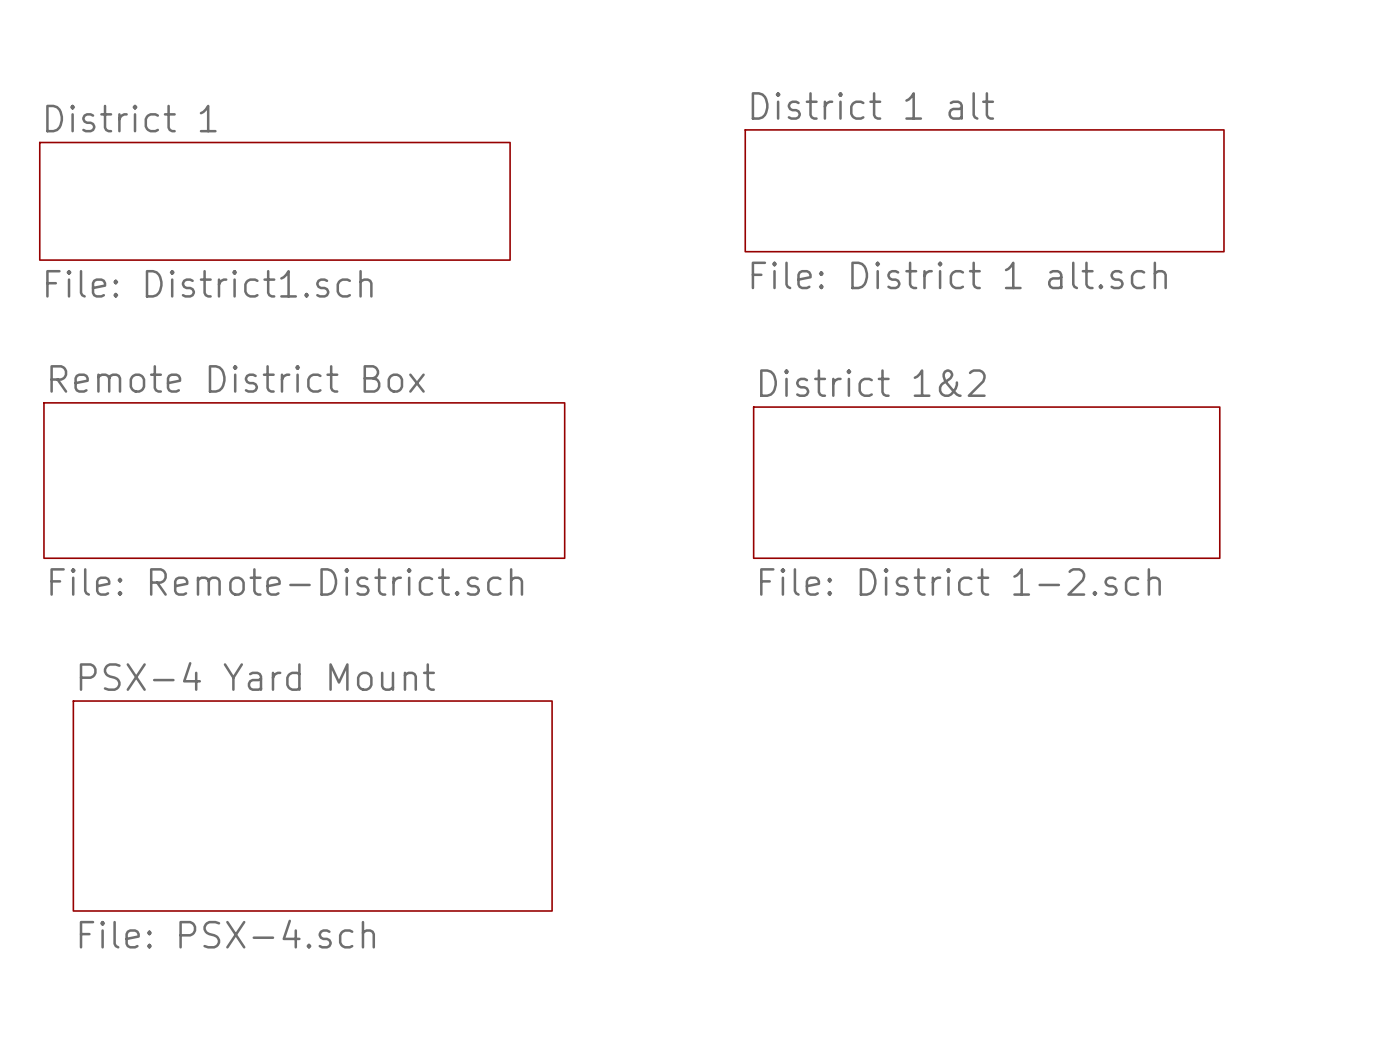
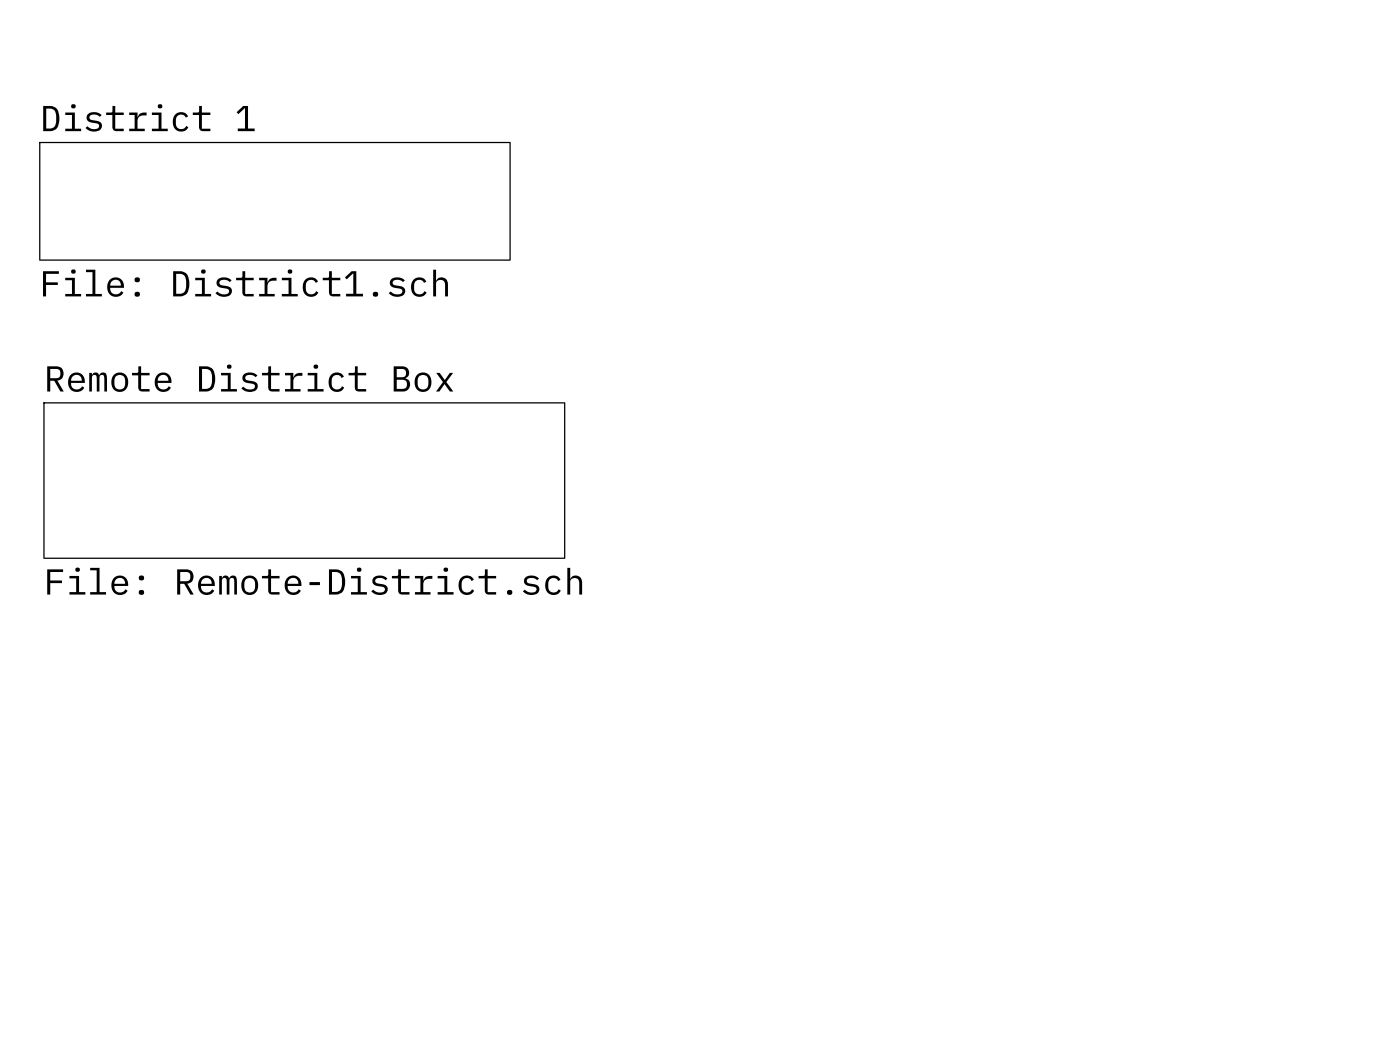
sheet District 1 alt: File: District 1 alt.sch (984, 190) -> none
sheet District 1&2: File: District 1-2.sch (986, 482) -> none
sheet PSX-4 Yard Mount: File: PSX-4.sch (312, 806) -> none

